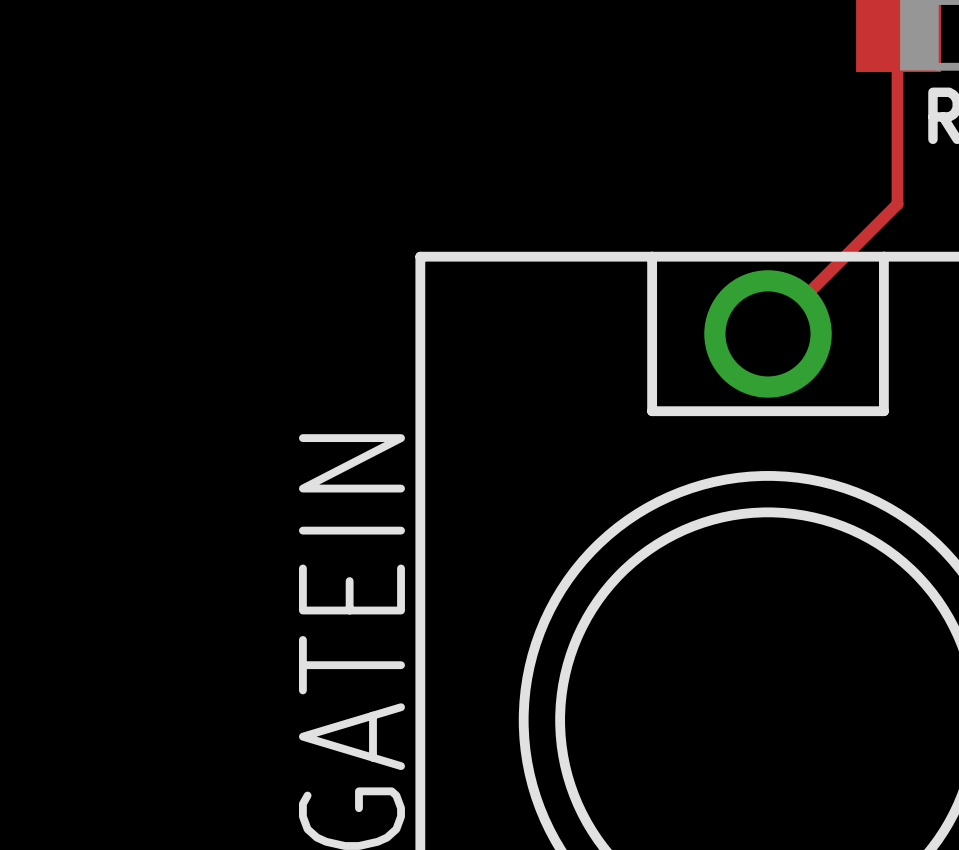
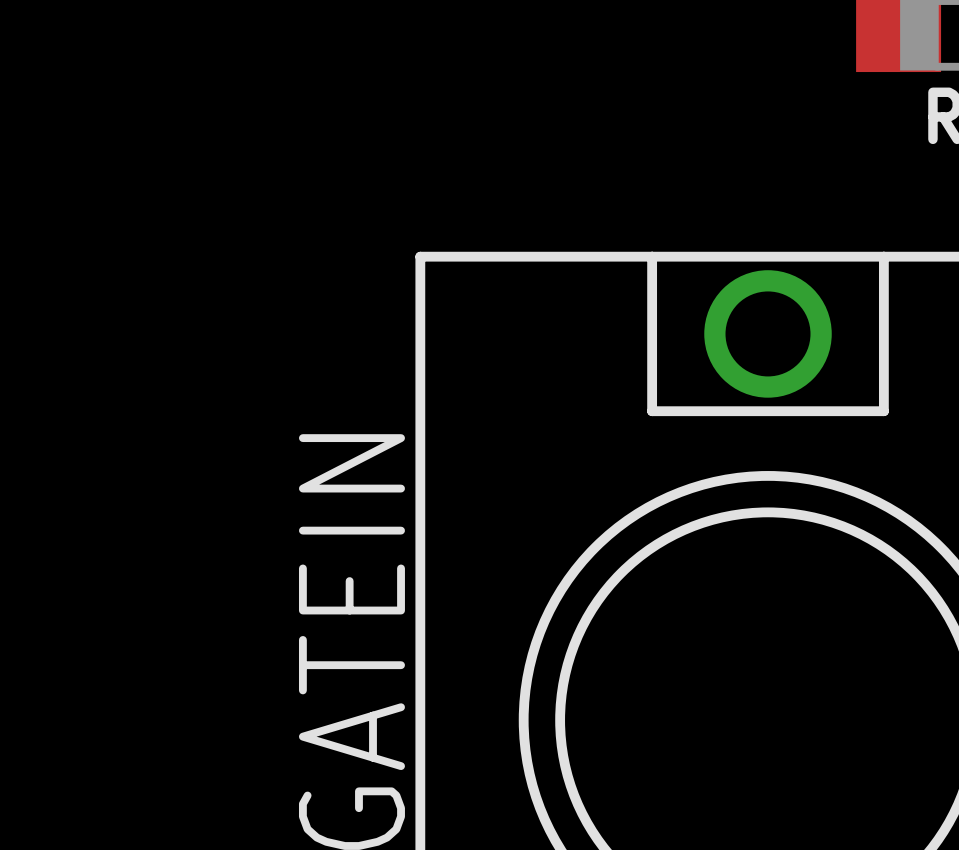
top track: (897, 33) (897, 204) (768, 333) -> none

